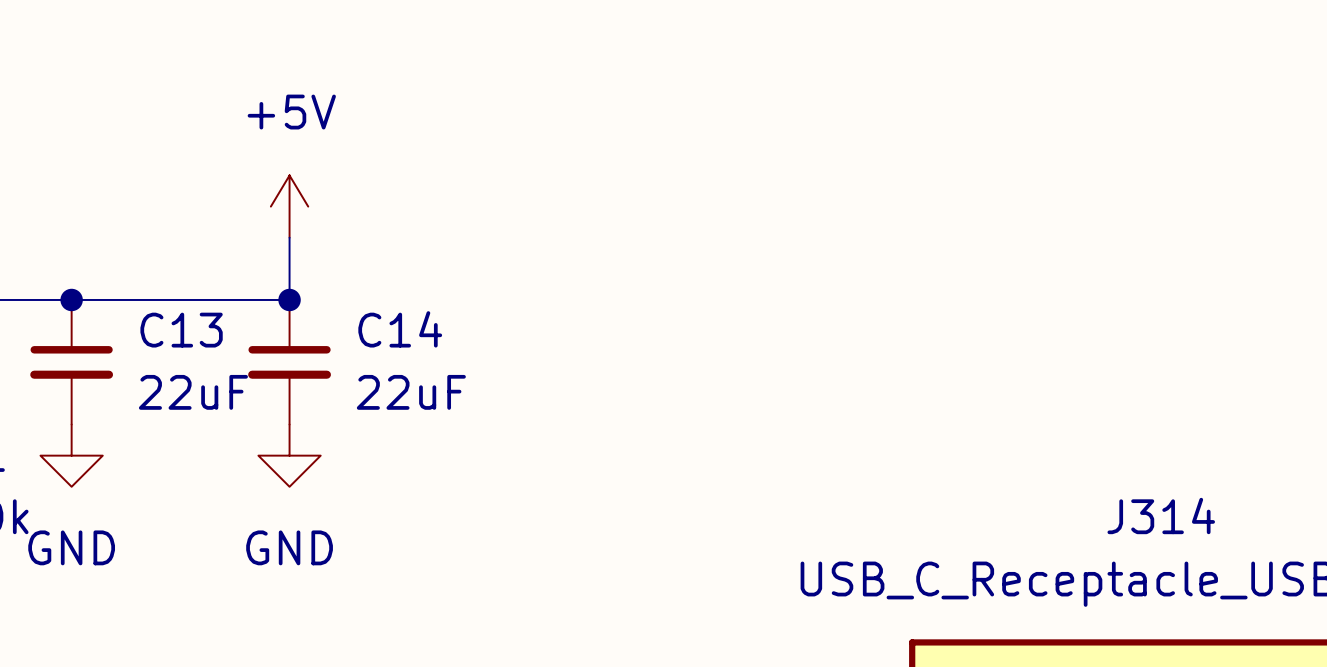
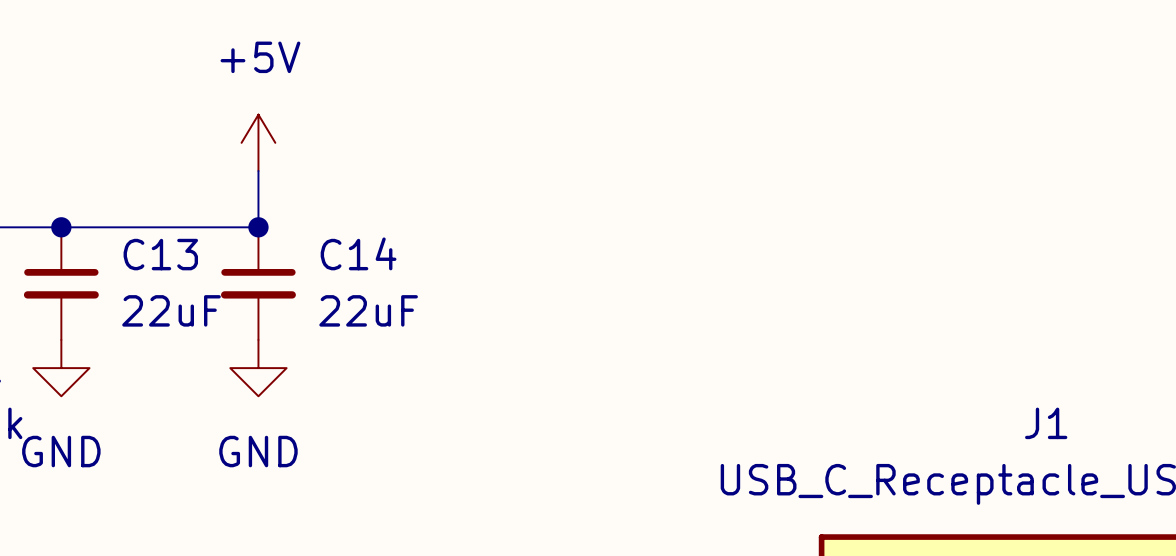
J314 name: J314 (1161, 516) -> J1 (1046, 423)

